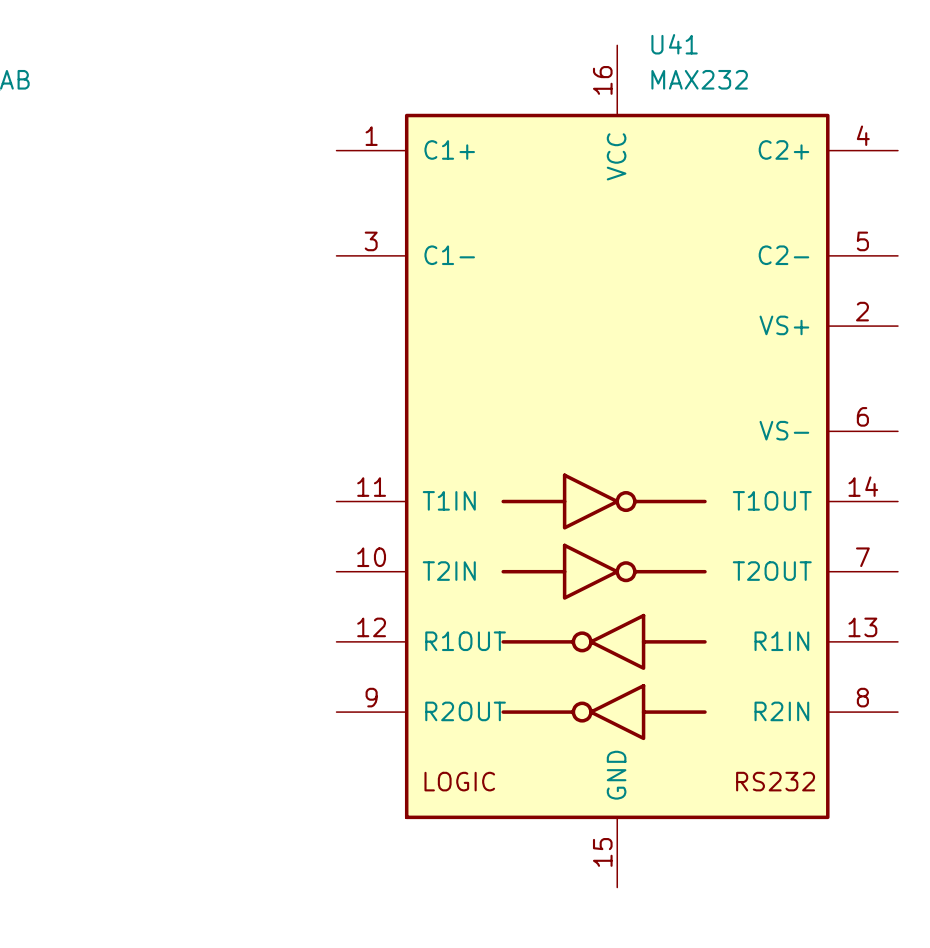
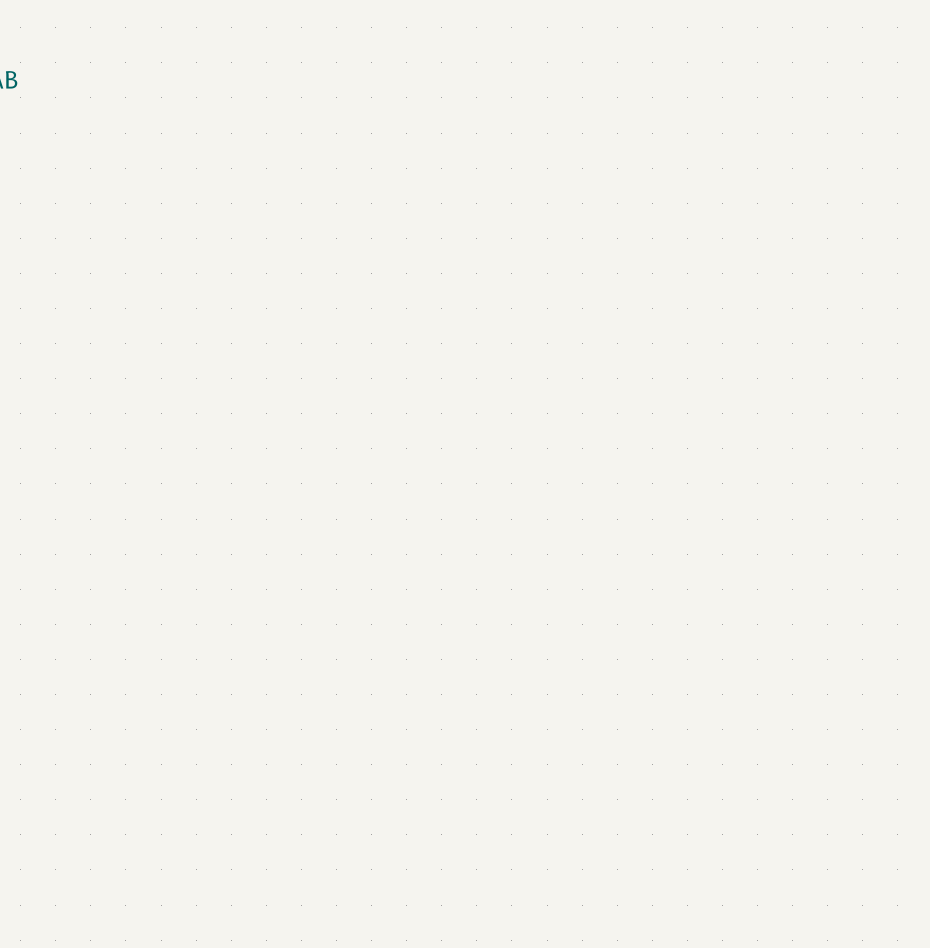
U41: MAX232 (617, 466) -> none

